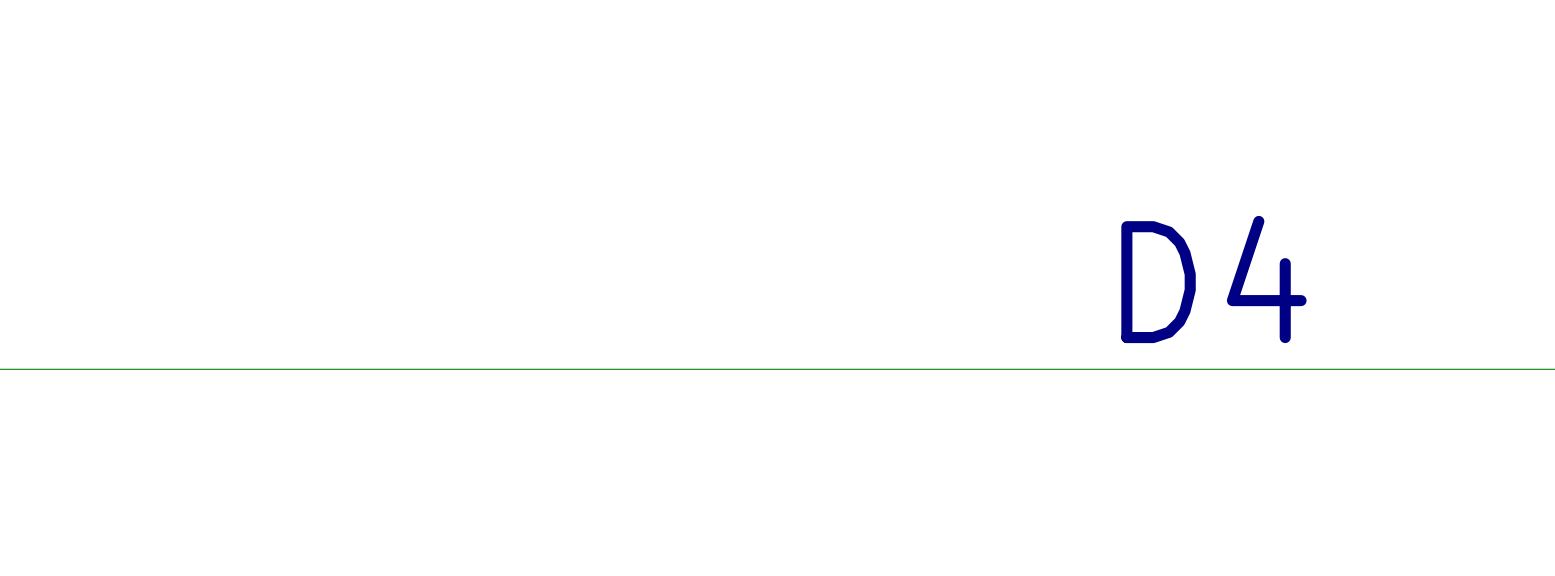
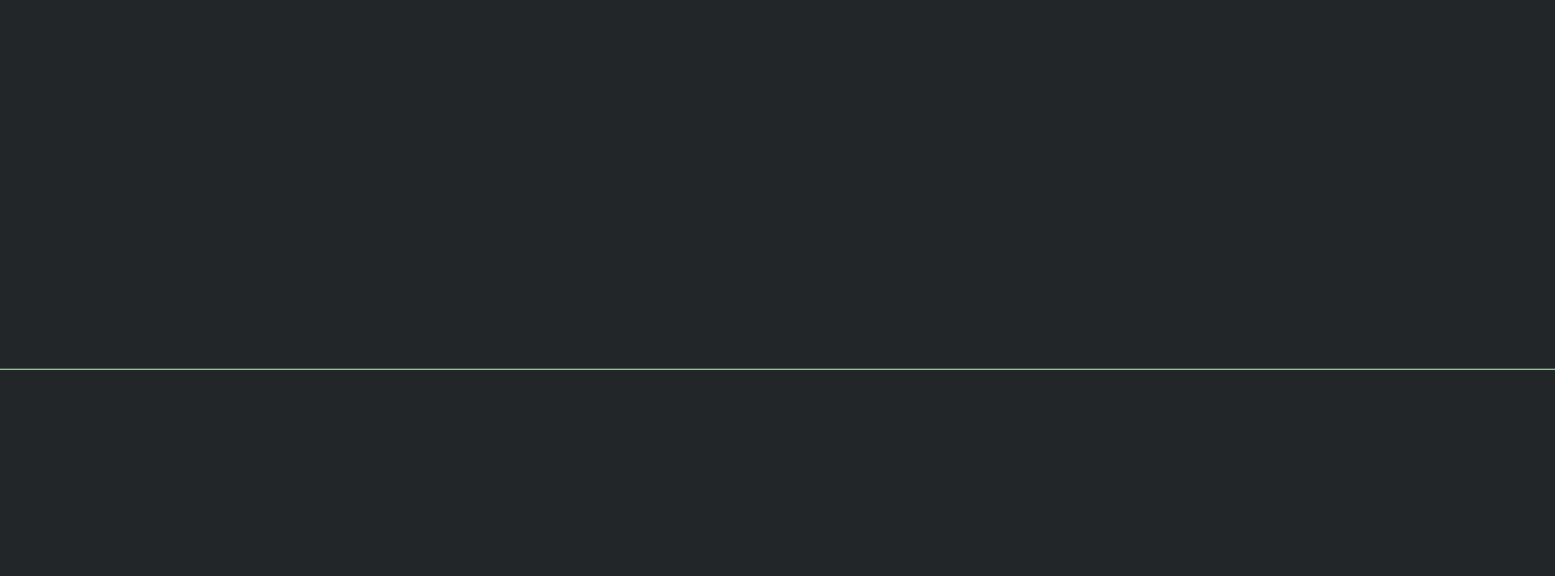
text: D4 (1213, 279) -> none

